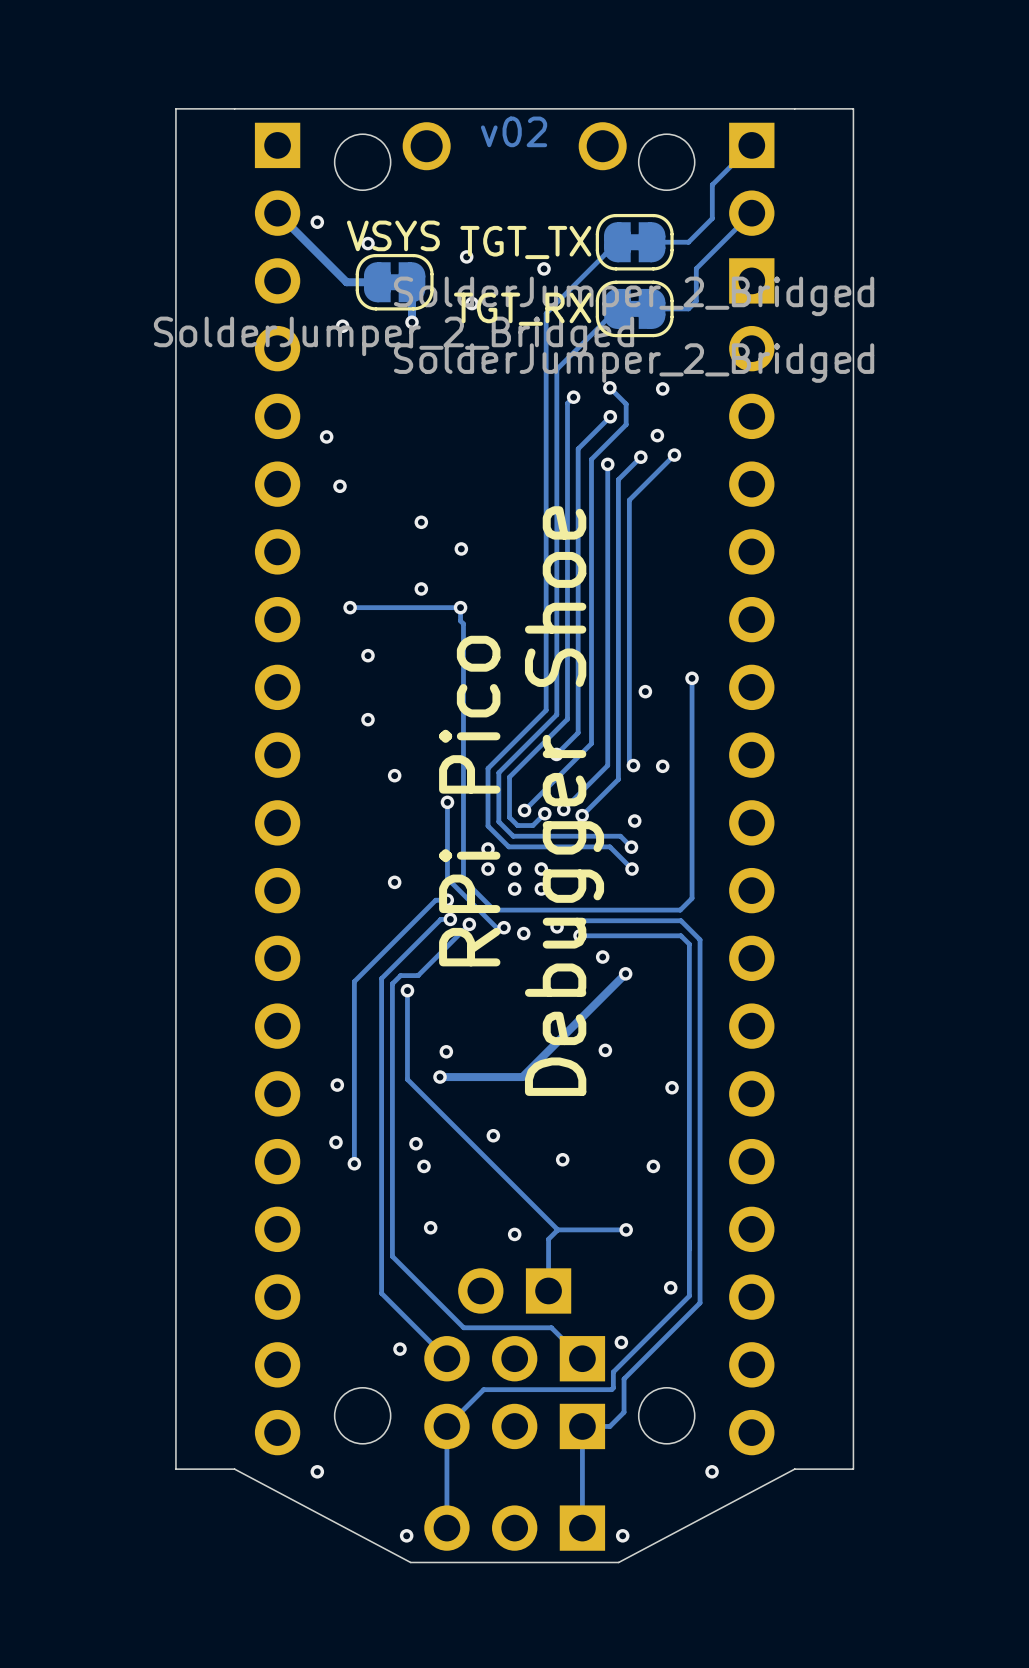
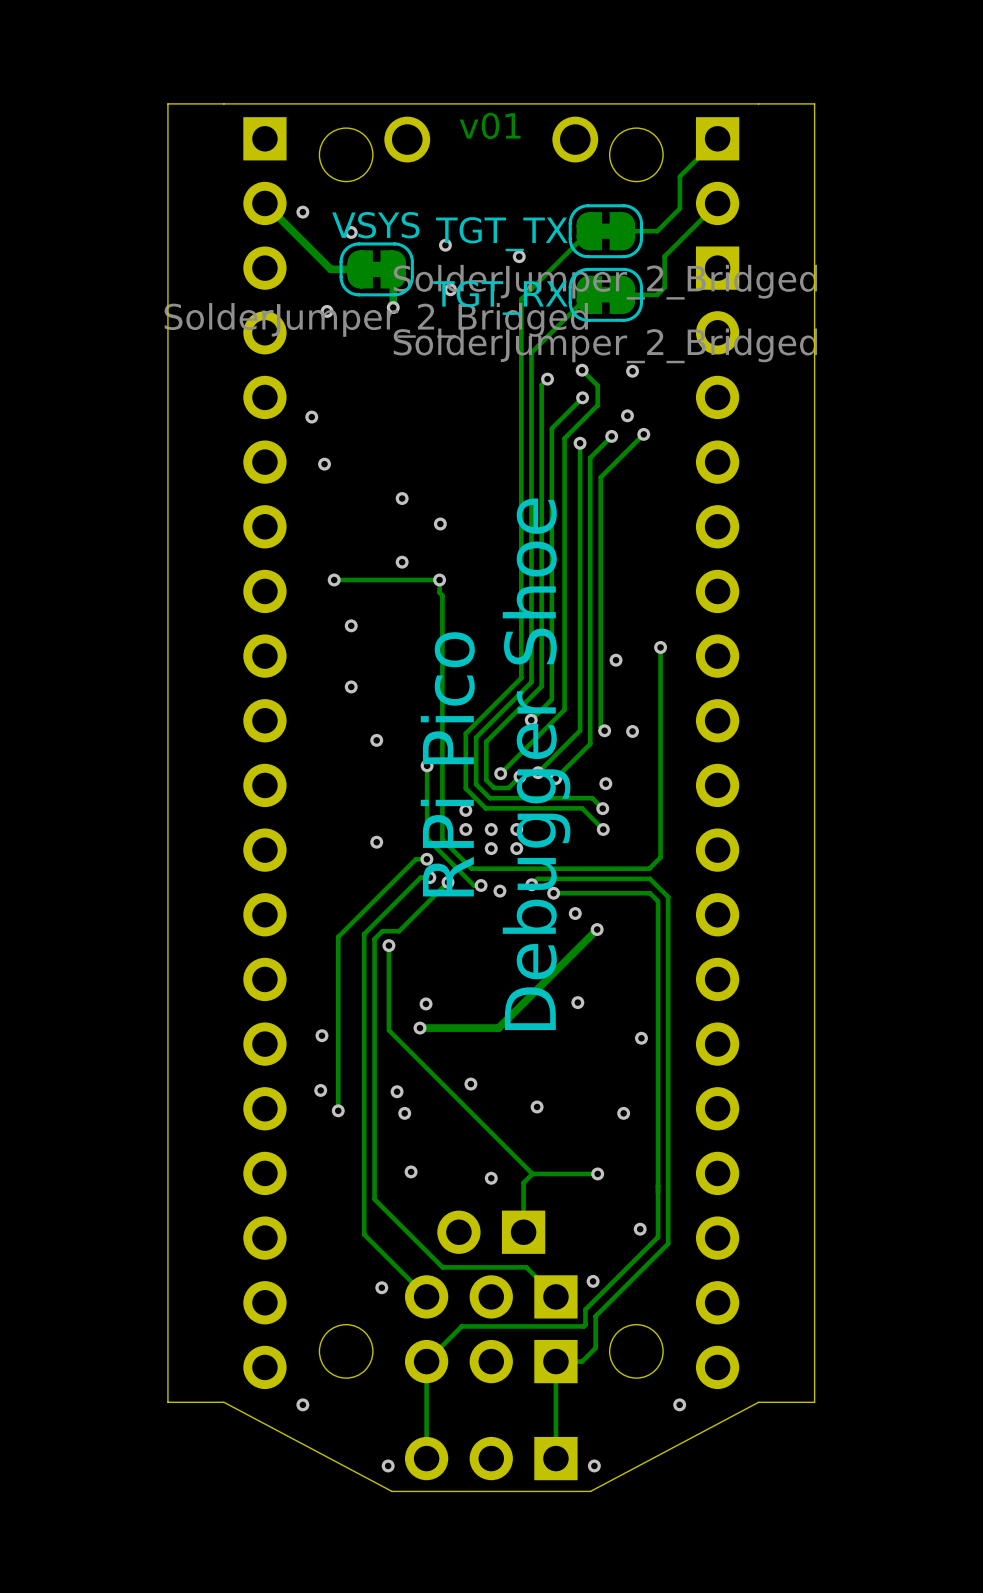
text: v02 (514, 131) -> v01 (490, 125)

